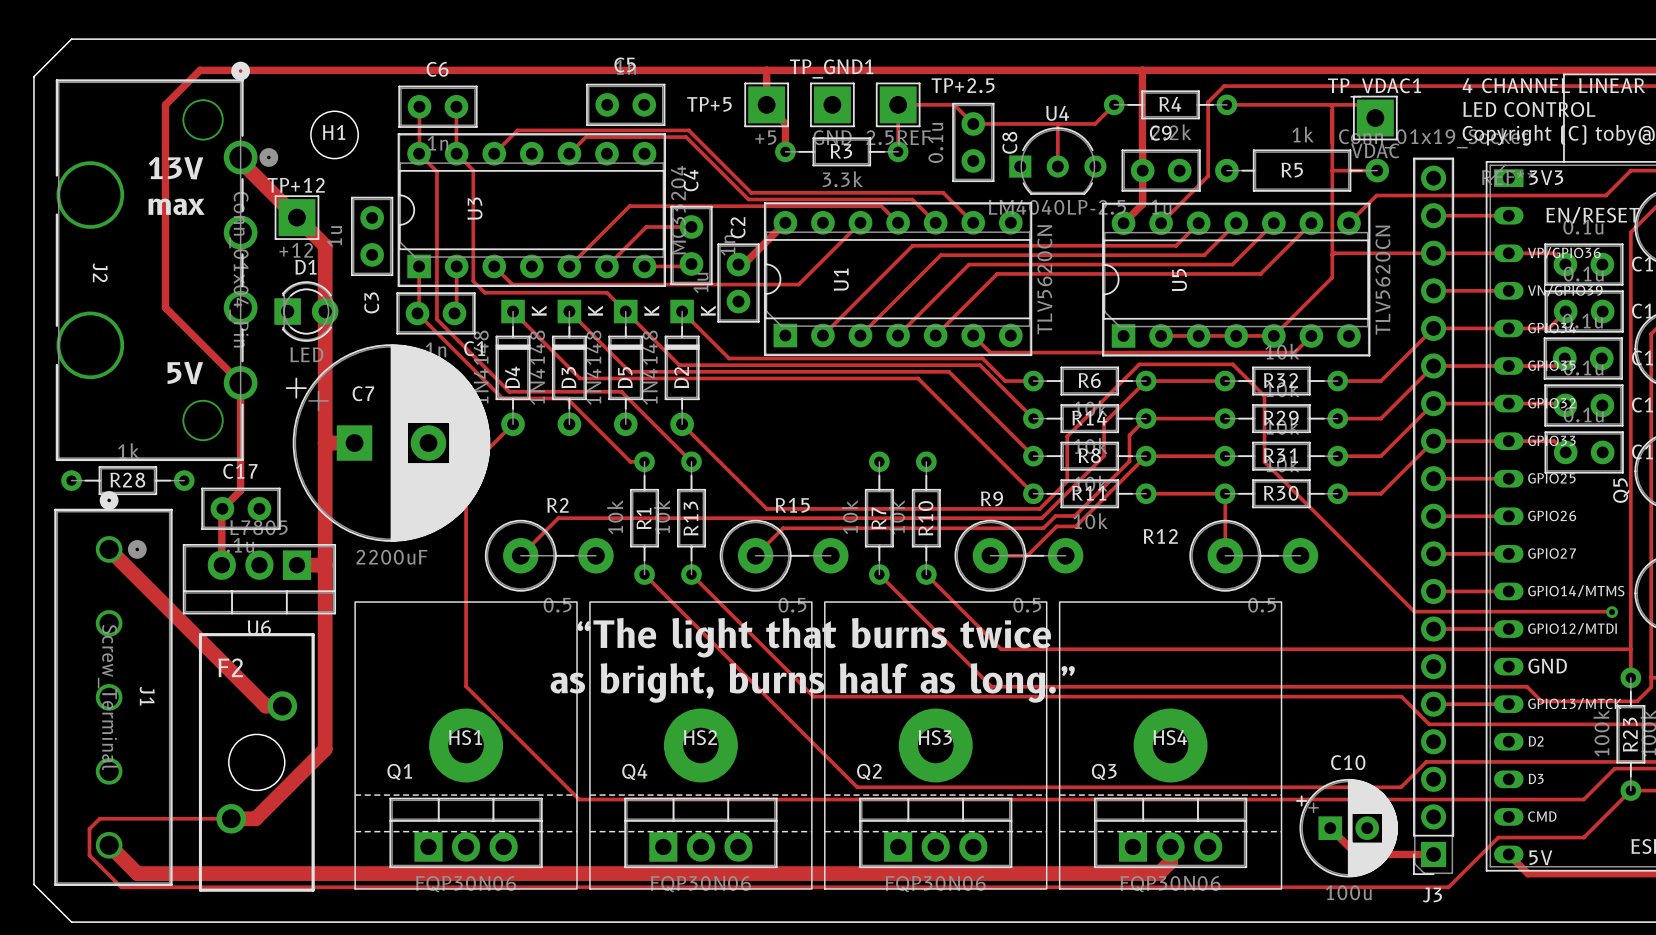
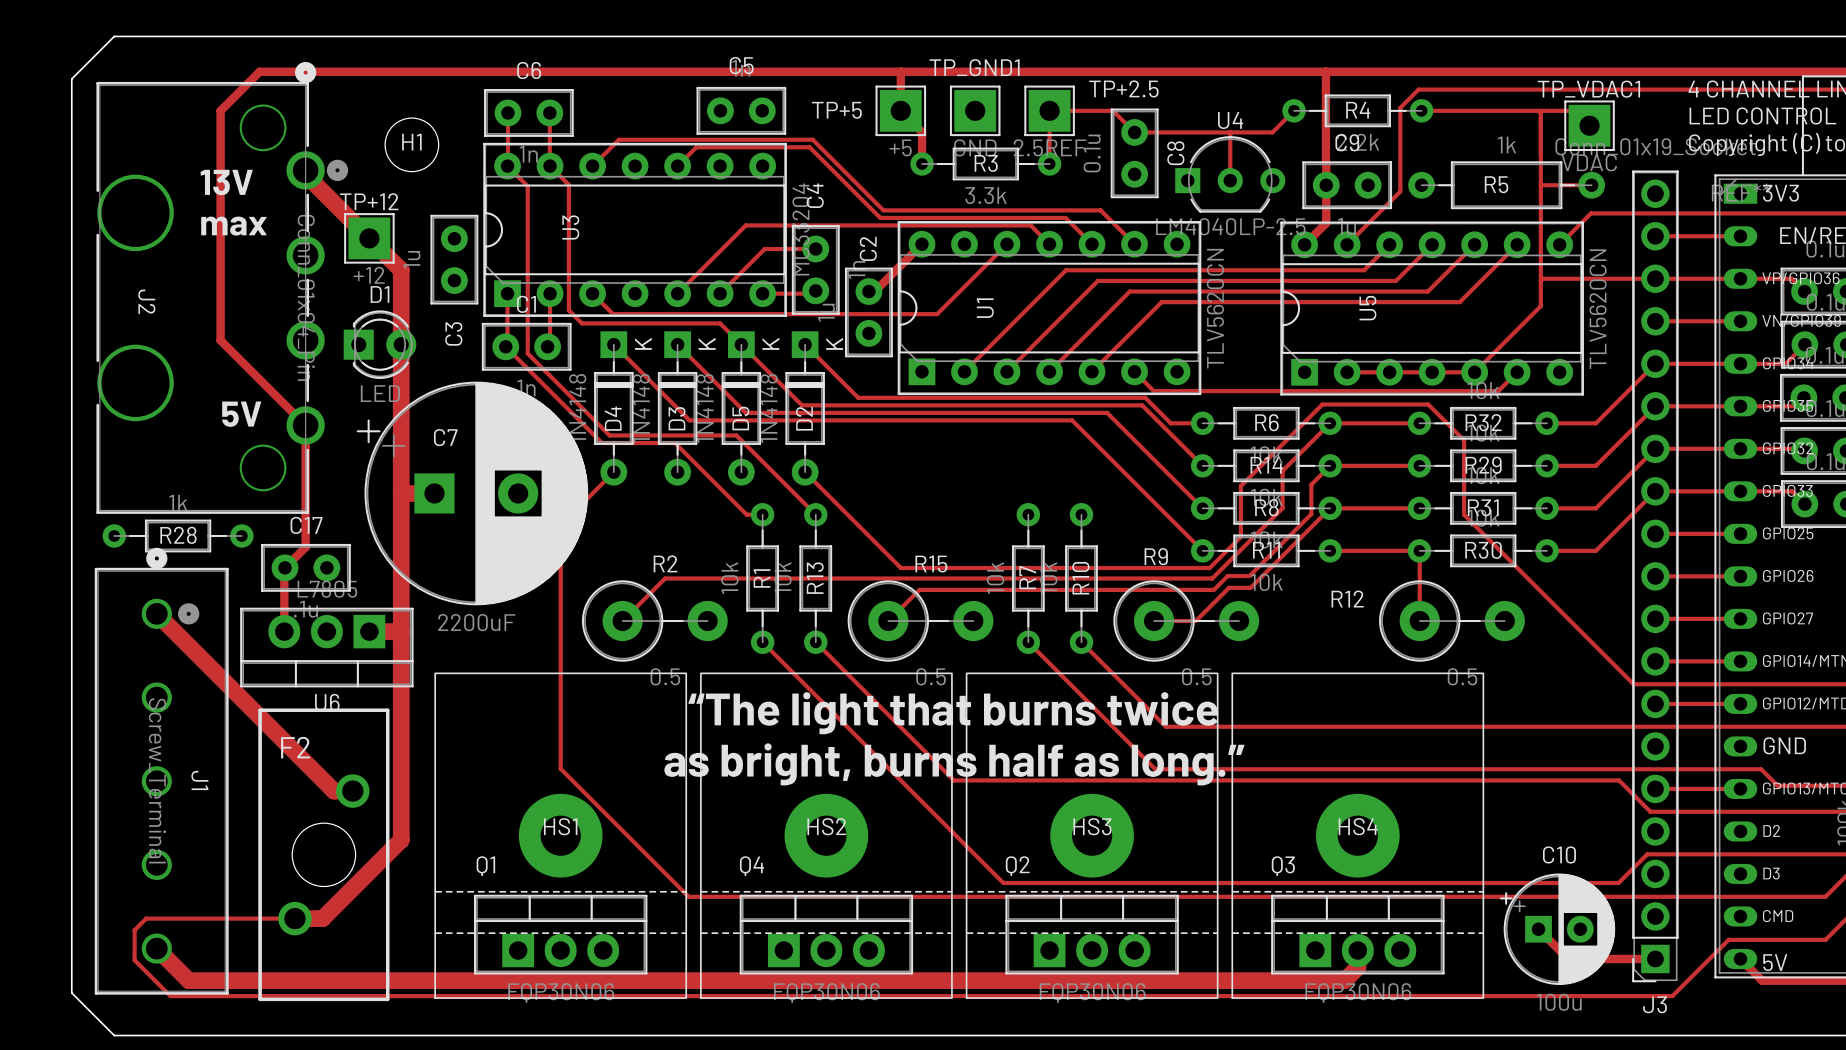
C1 name position: C1 (474, 348) -> C1 (526, 304)

